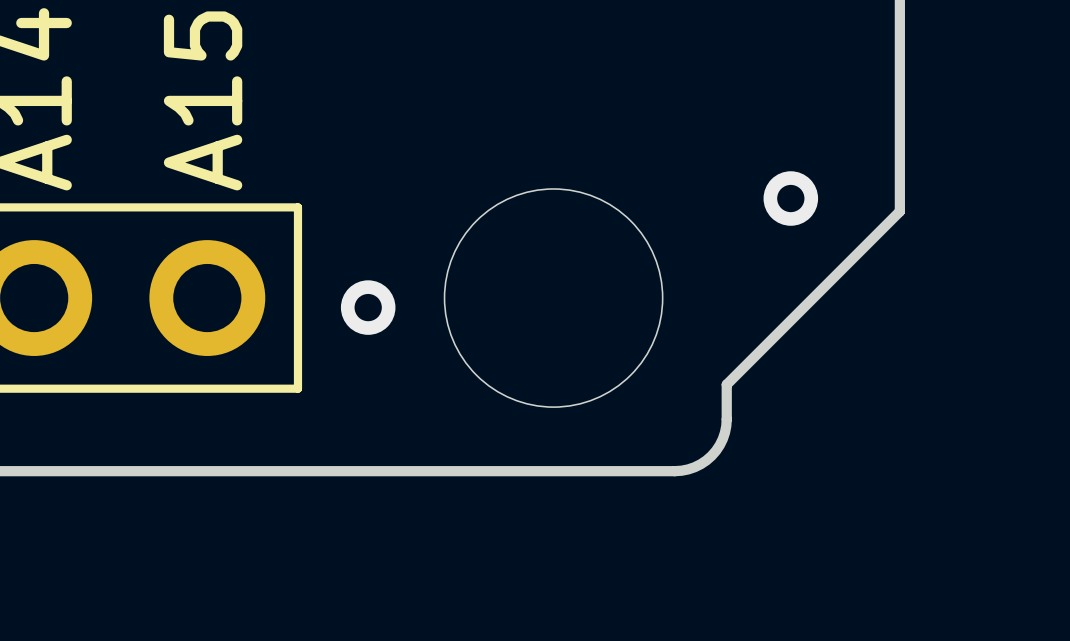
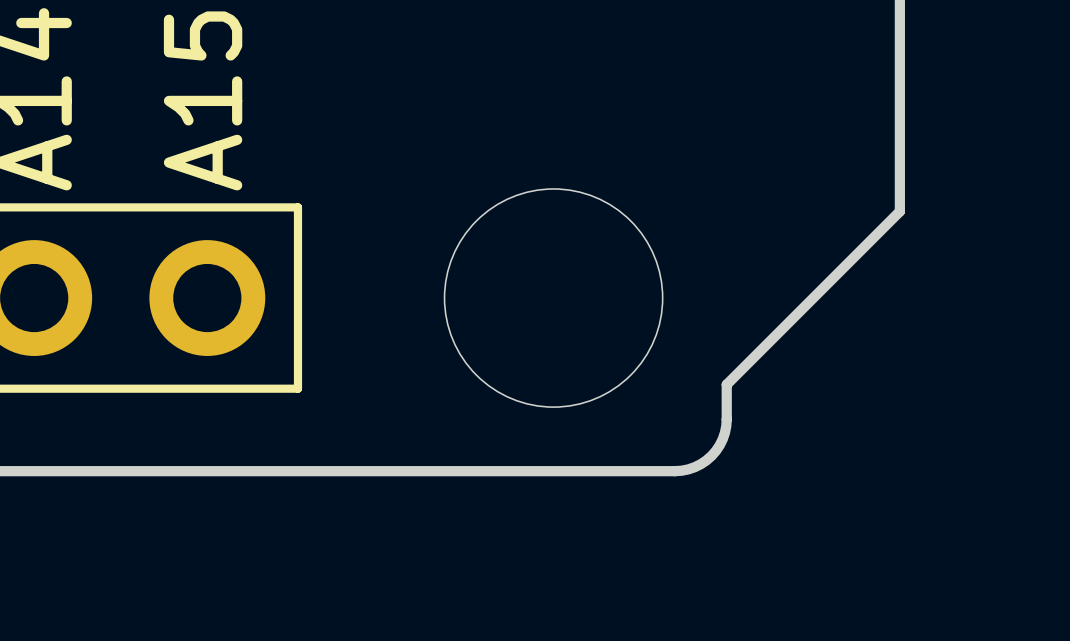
via: (790, 198) -> none
via: (368, 307) -> none

